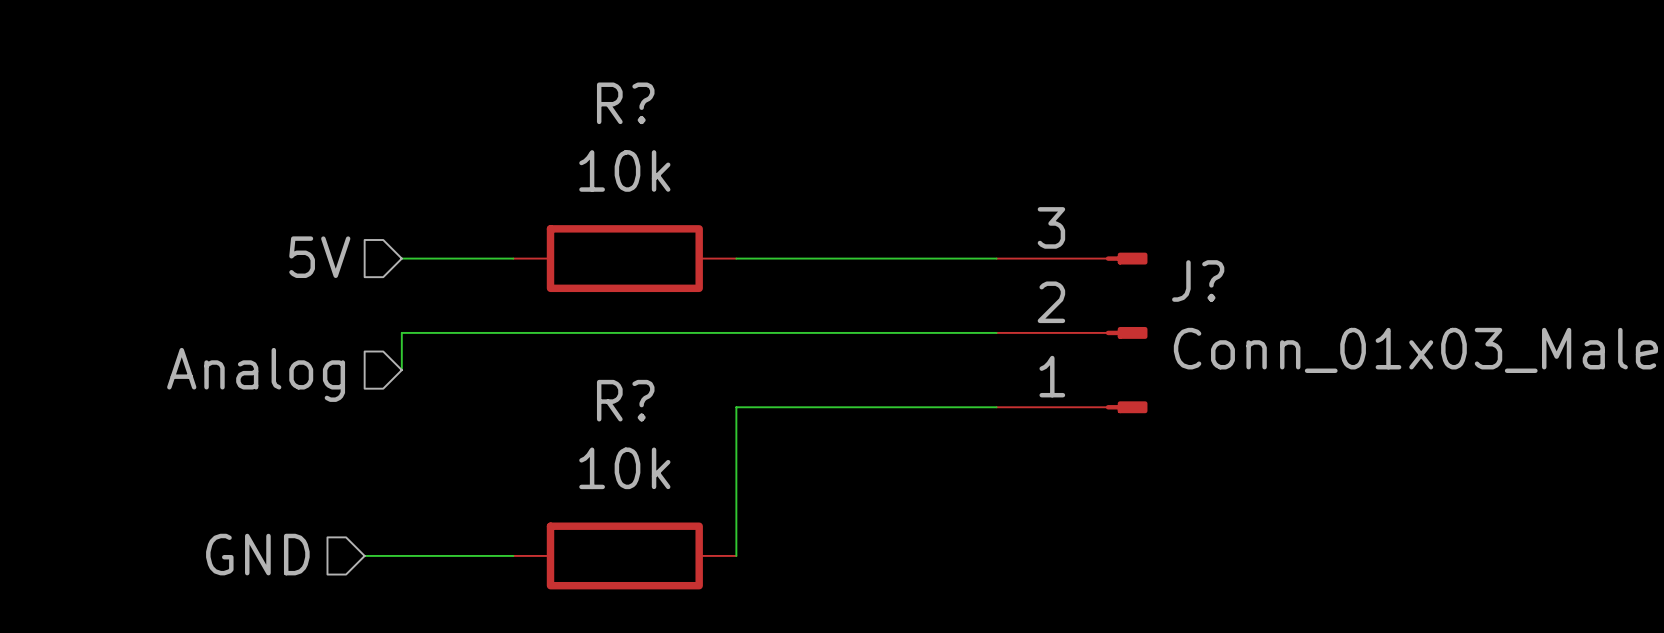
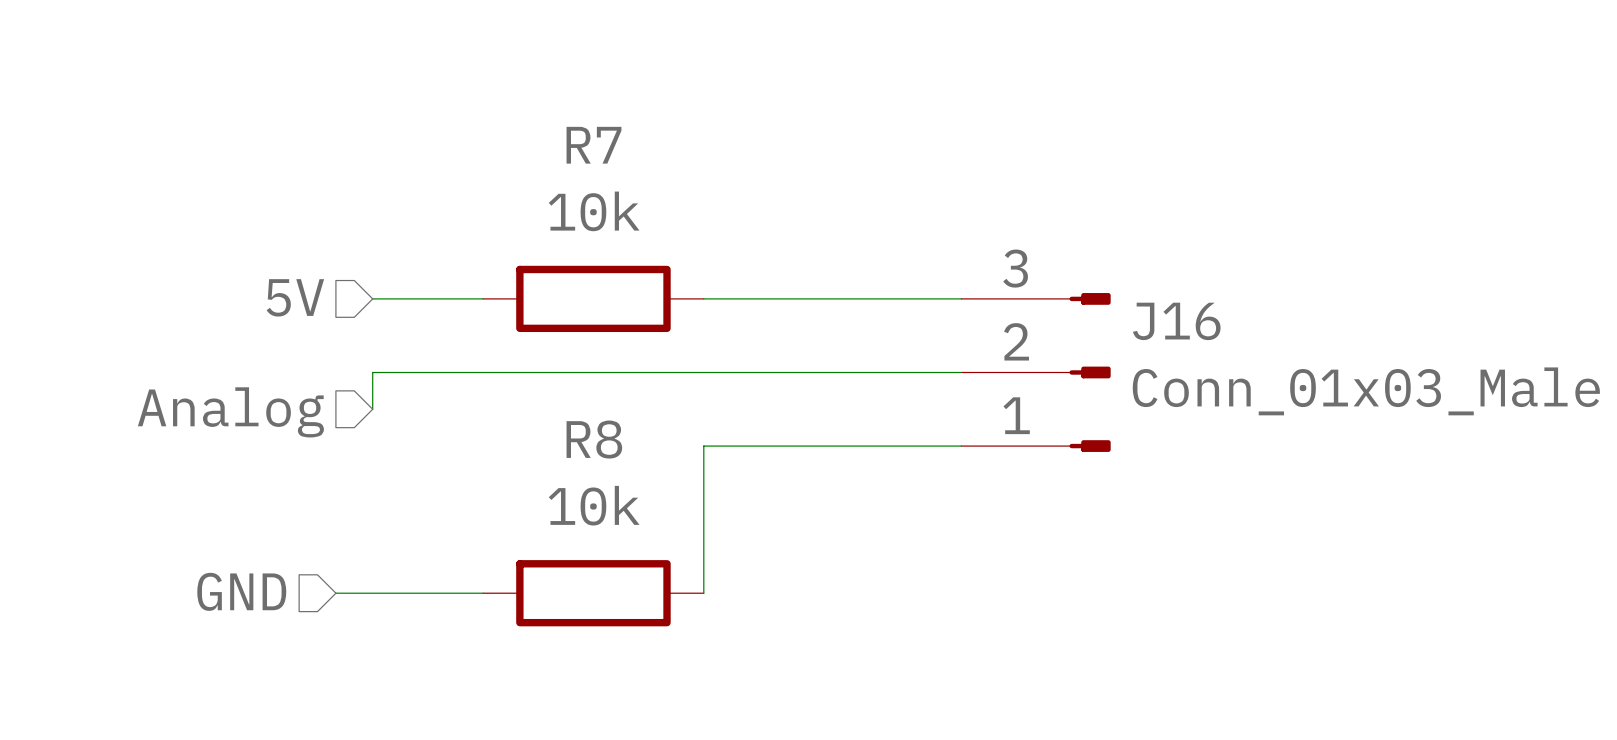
R? name: R? (625, 103) -> R7 (593, 145)
J? name: J? (1198, 280) -> J16 (1176, 321)
R? name: R? (625, 400) -> R8 (594, 439)

